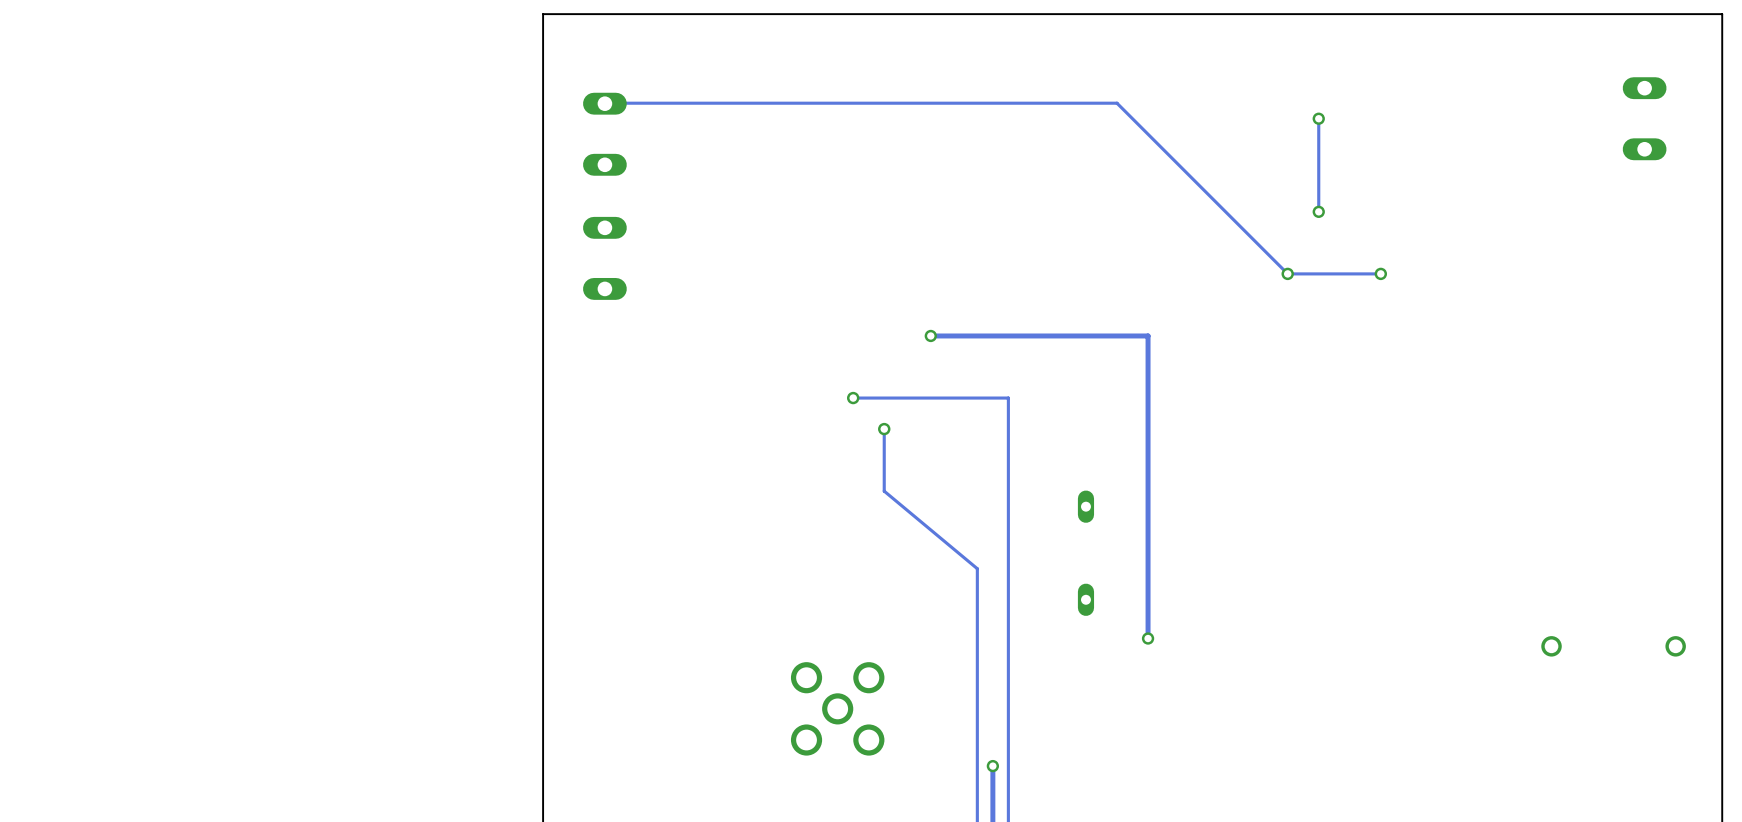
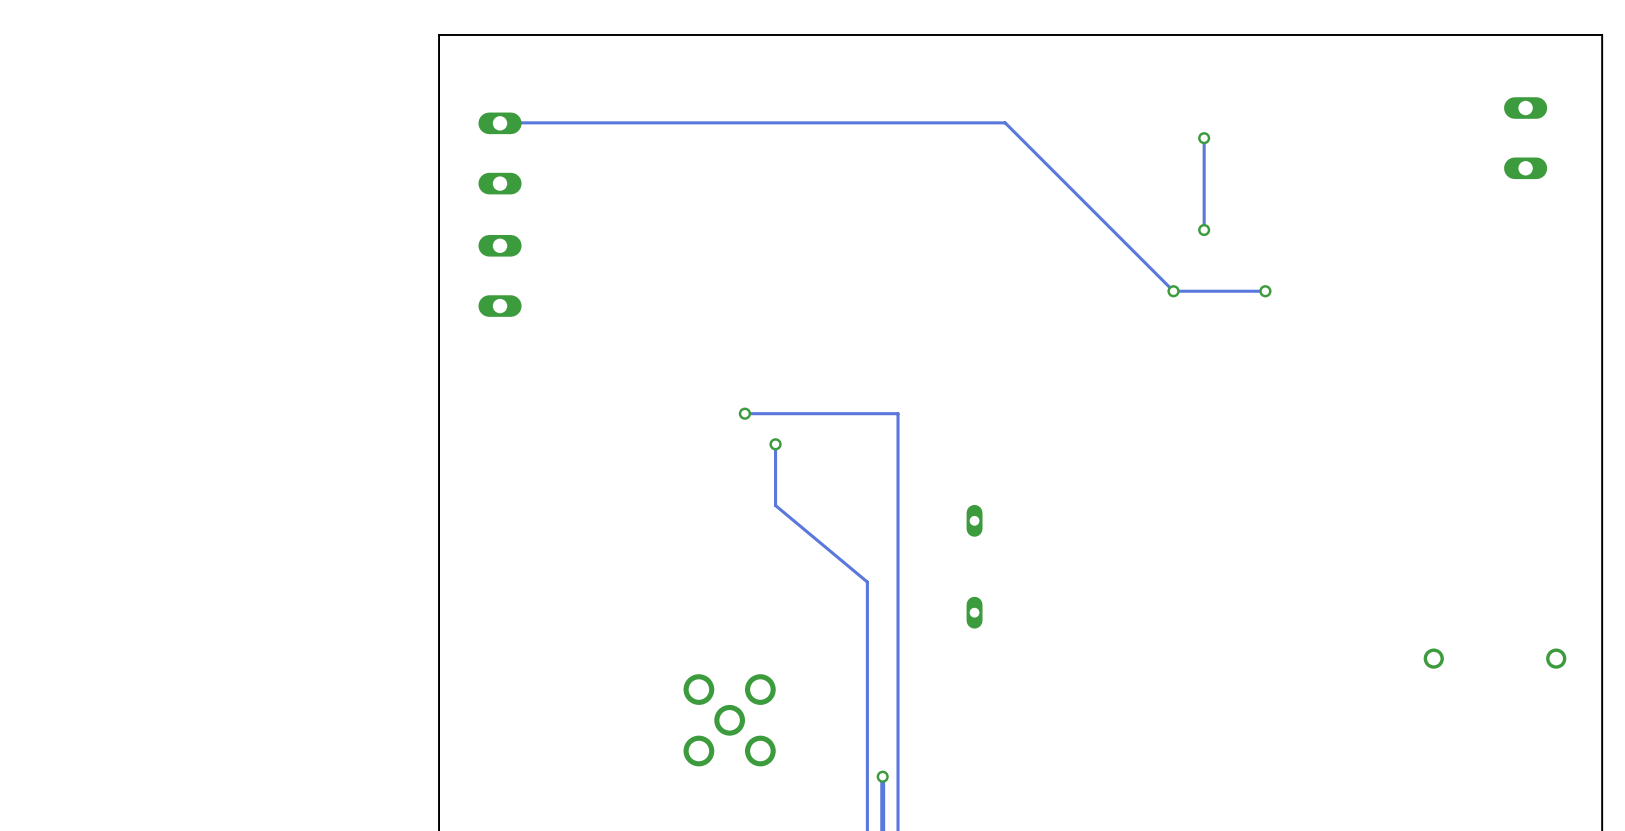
track: (930, 335) (1148, 335) (1148, 638) -> none
via: (930, 335) -> none
via: (1148, 638) -> none

